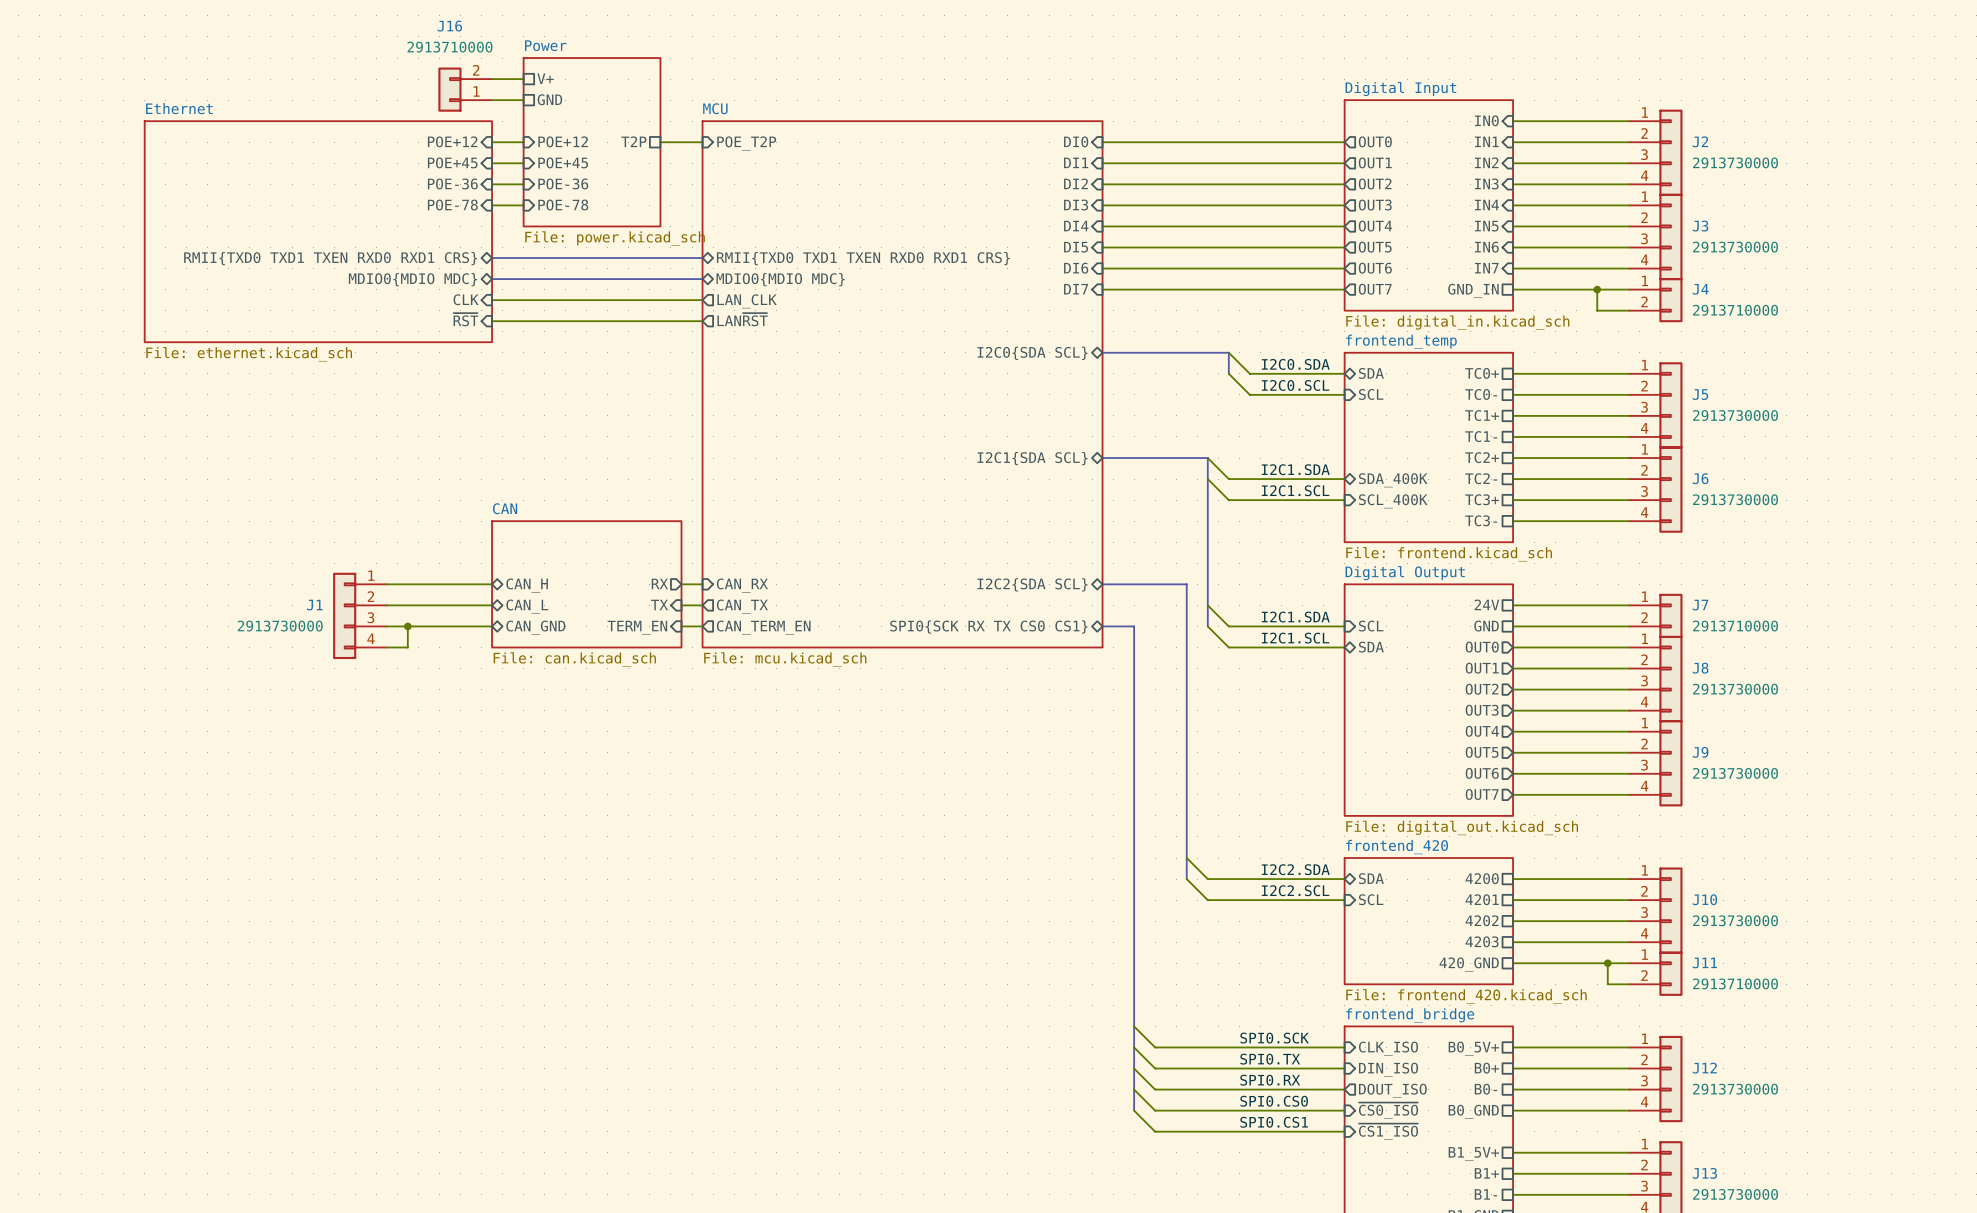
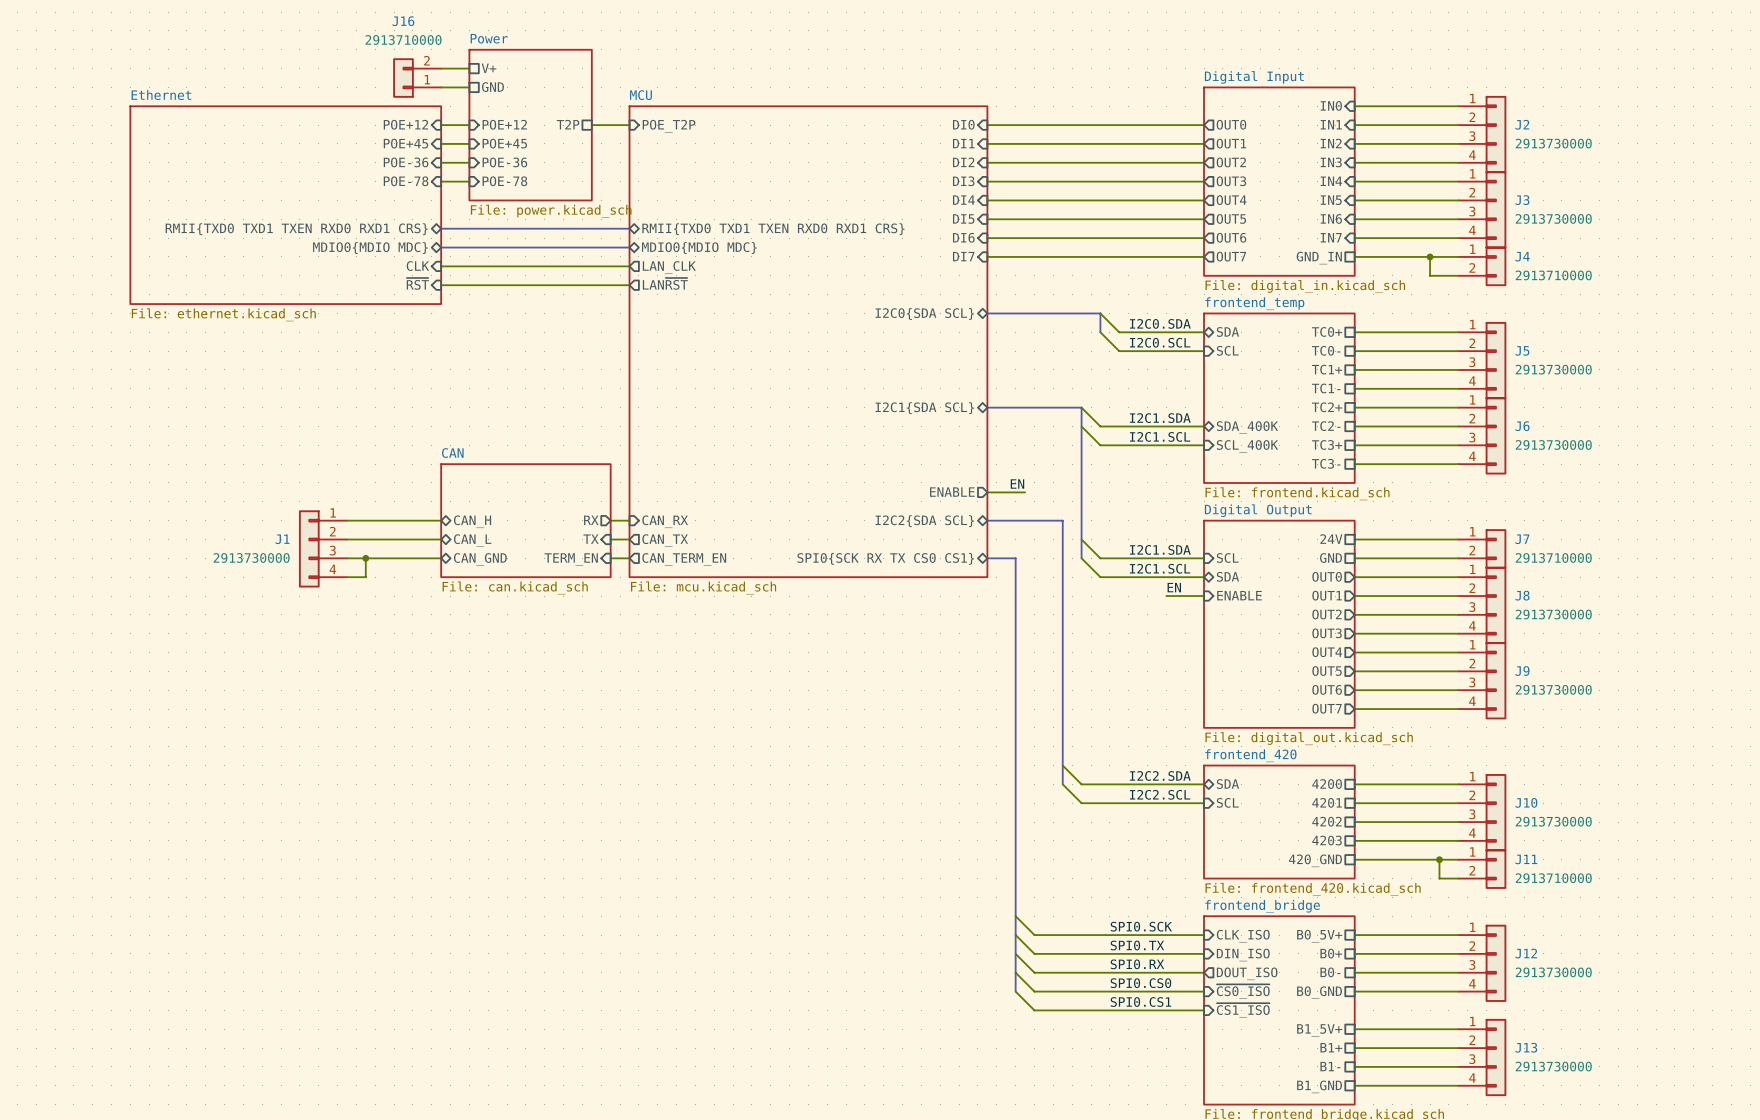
label: none -> EN (1017, 484)
sheet pin: none -> ENABLE (952, 492)
wire: none -> (987, 492) (1025, 492)
label: none -> EN (1174, 587)
wire: none -> (1166, 596) (1204, 596)
sheet pin: none -> ENABLE (1239, 595)

